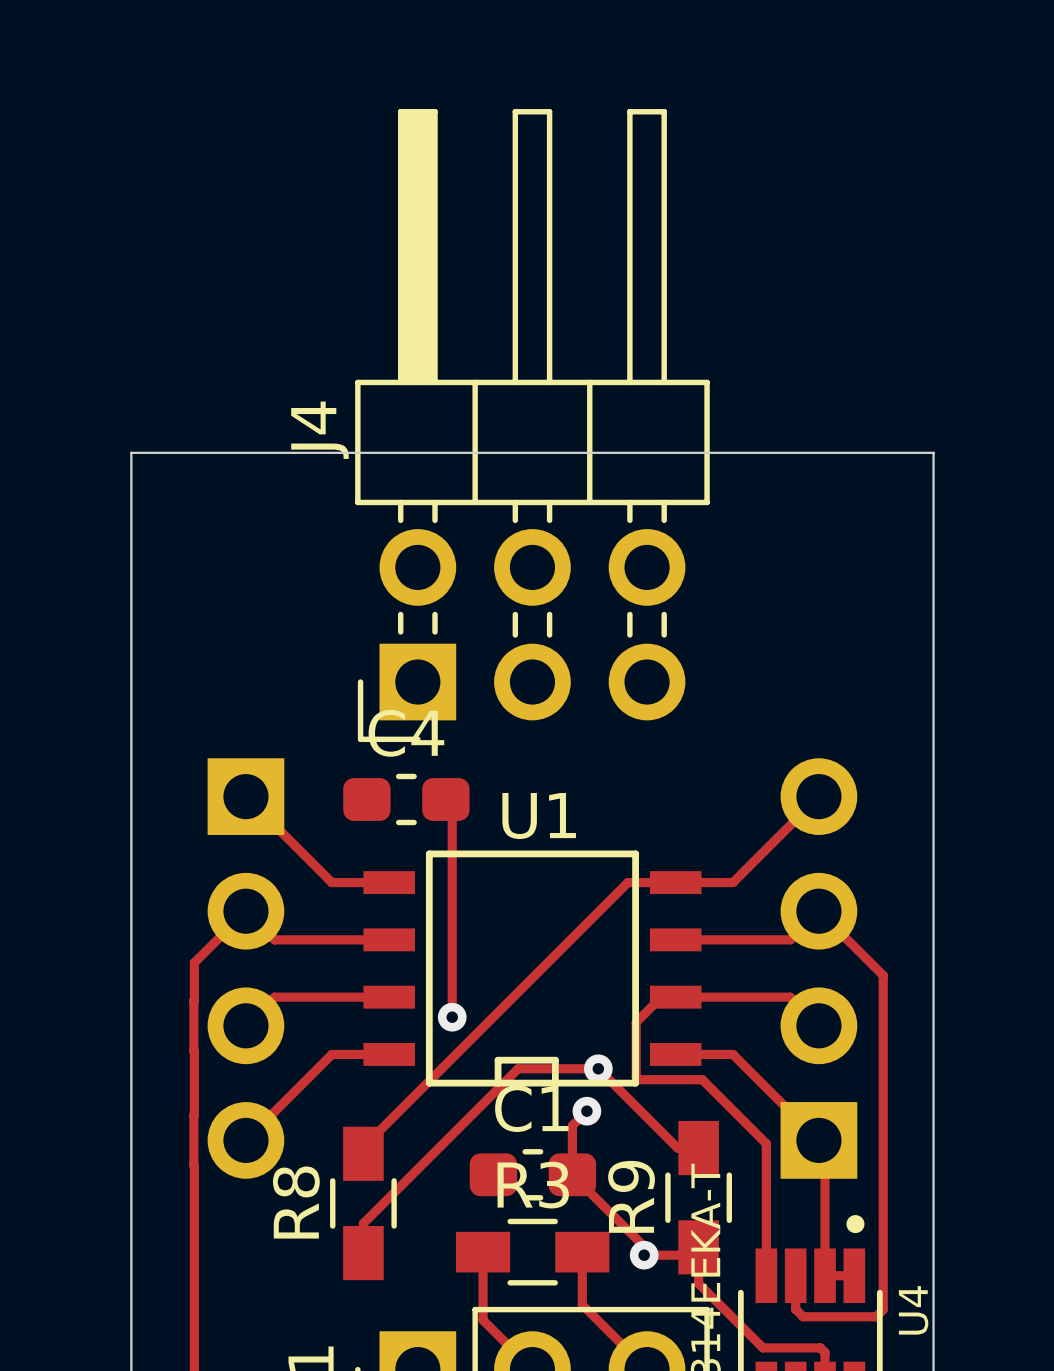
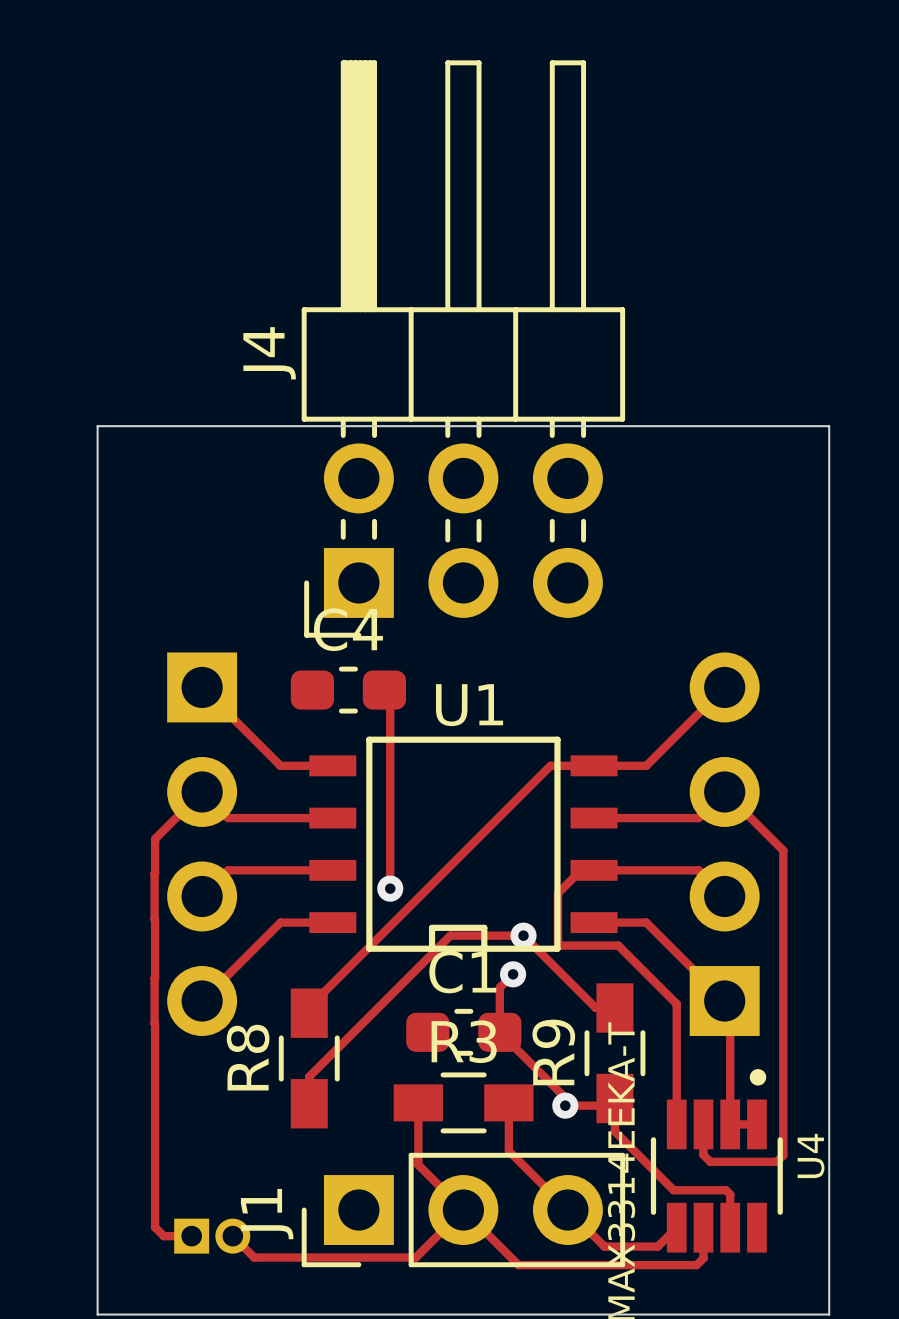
board edge: (131, 510) (131, 452) (933, 452) (933, 510) -> (97, 426) (829, 426)

